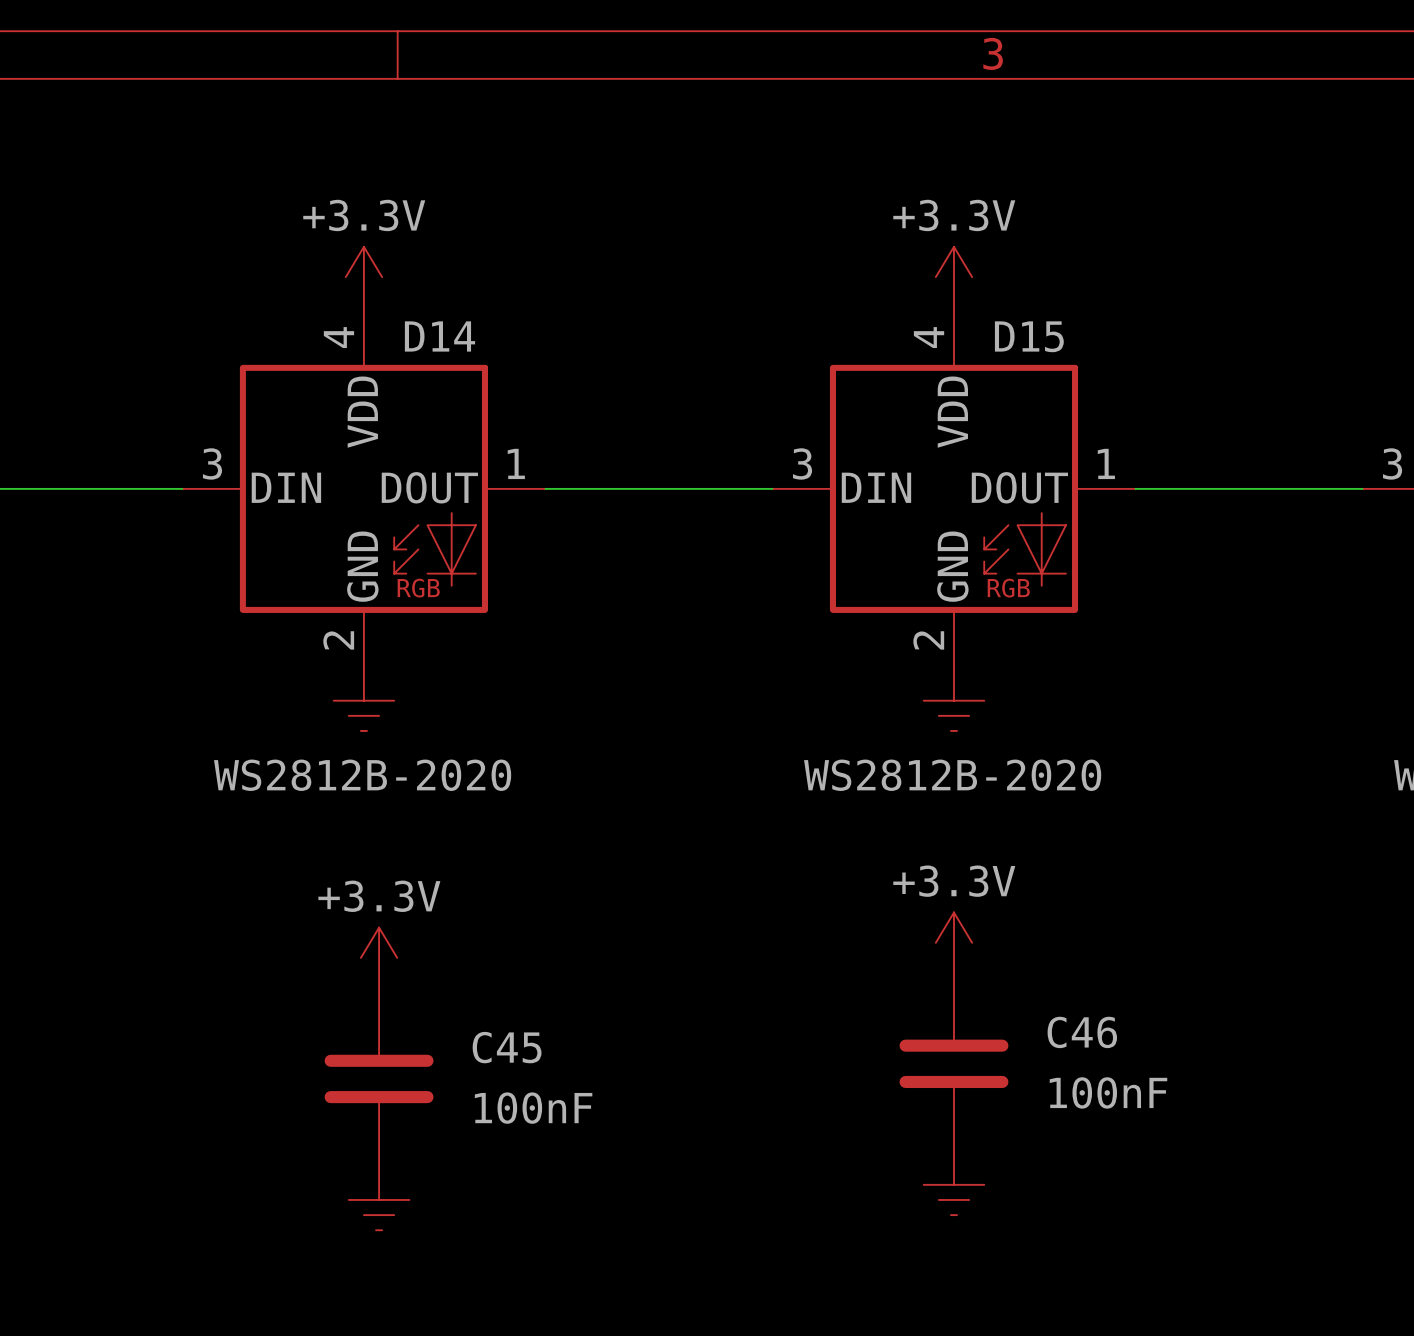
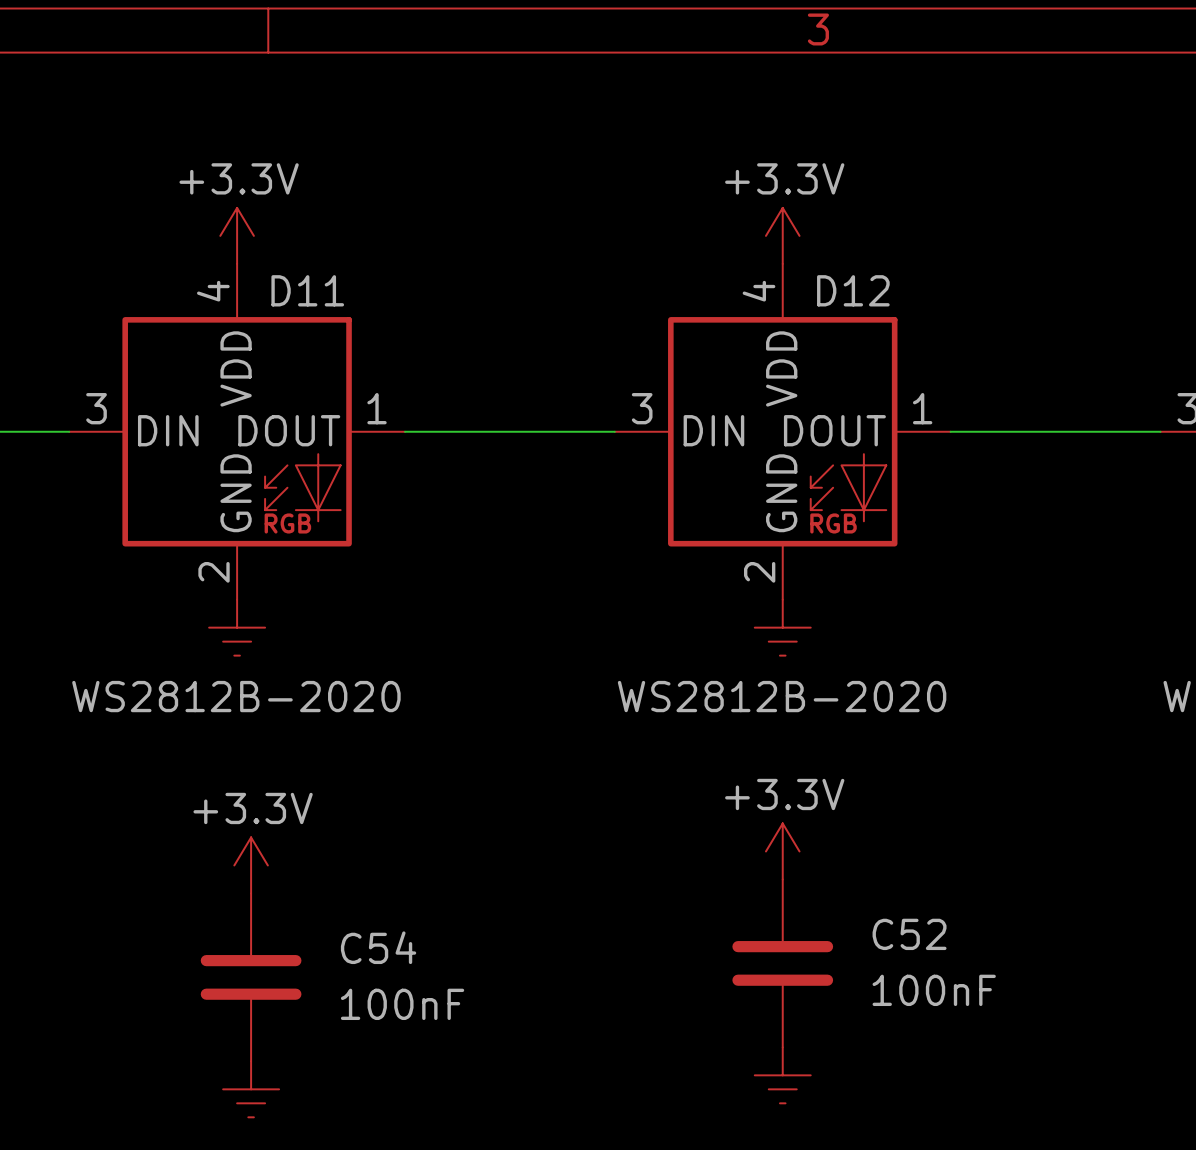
D14 name: D14 (439, 336) -> D11 (307, 290)
D15 name: D15 (1029, 336) -> D12 (853, 290)
C46 name: C46 (1082, 1032) -> C52 (909, 934)
C45 name: C45 (507, 1047) -> C54 (378, 947)

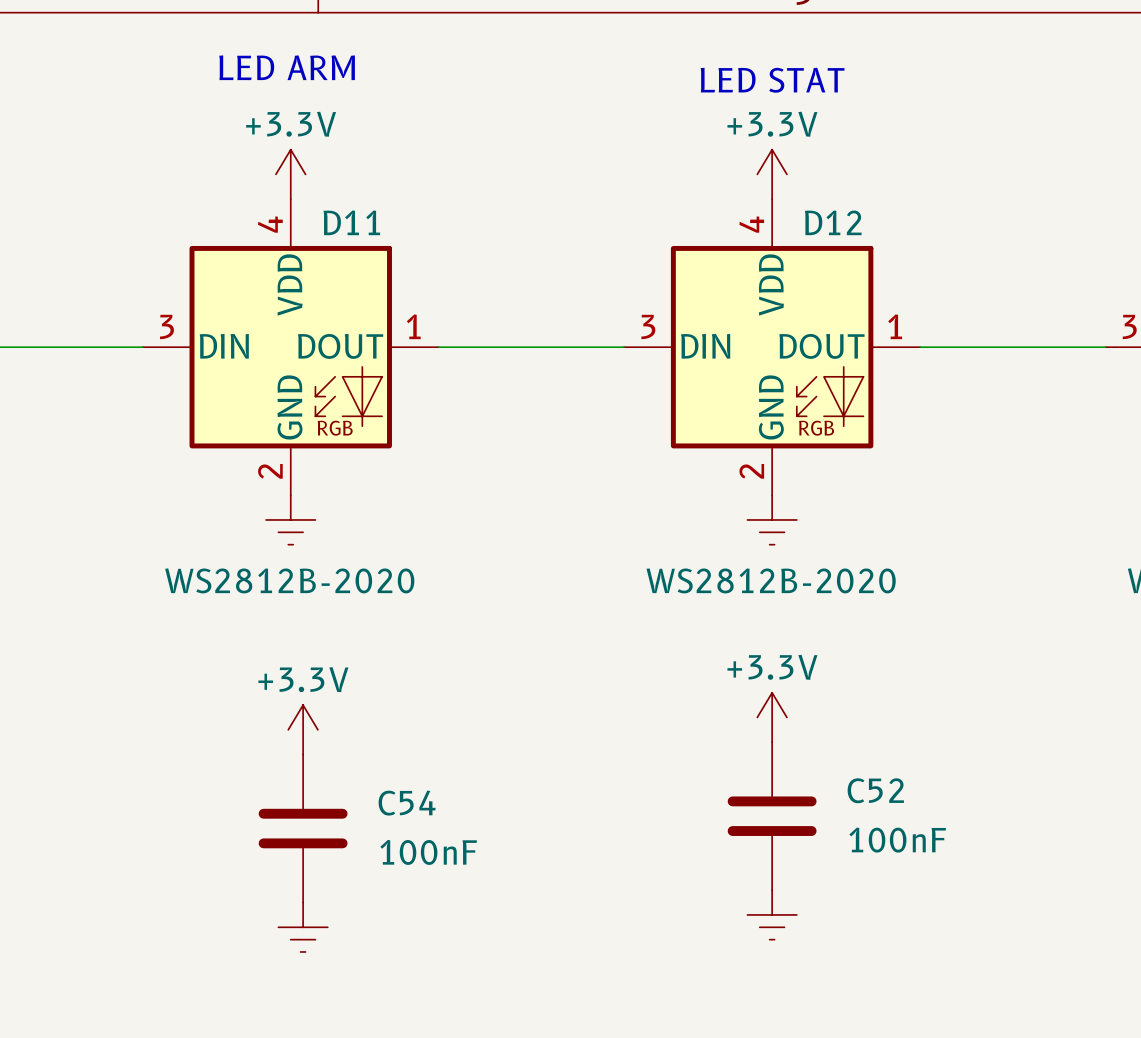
text: none -> LED ARM (287, 67)
text: none -> LED STAT (772, 80)

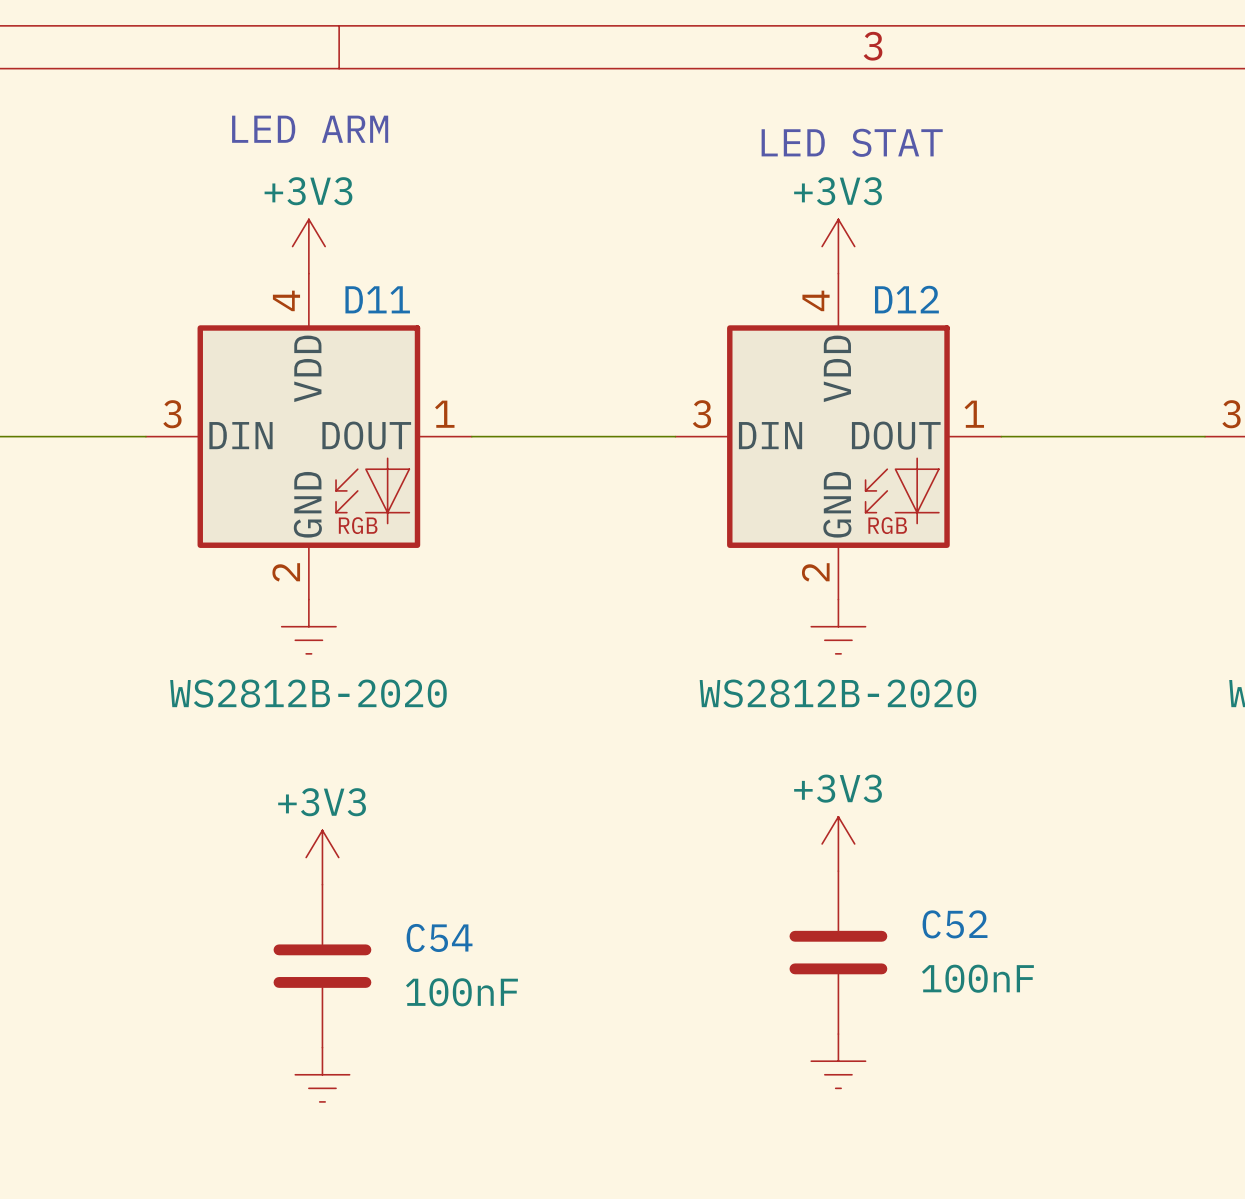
power symbol: +3.3V (290, 174) -> +3V3 (308, 246)
power symbol: +3.3V (772, 174) -> +3V3 (838, 246)
power symbol: +3.3V (772, 717) -> +3V3 (838, 843)
power symbol: +3.3V (303, 729) -> +3V3 (322, 857)

